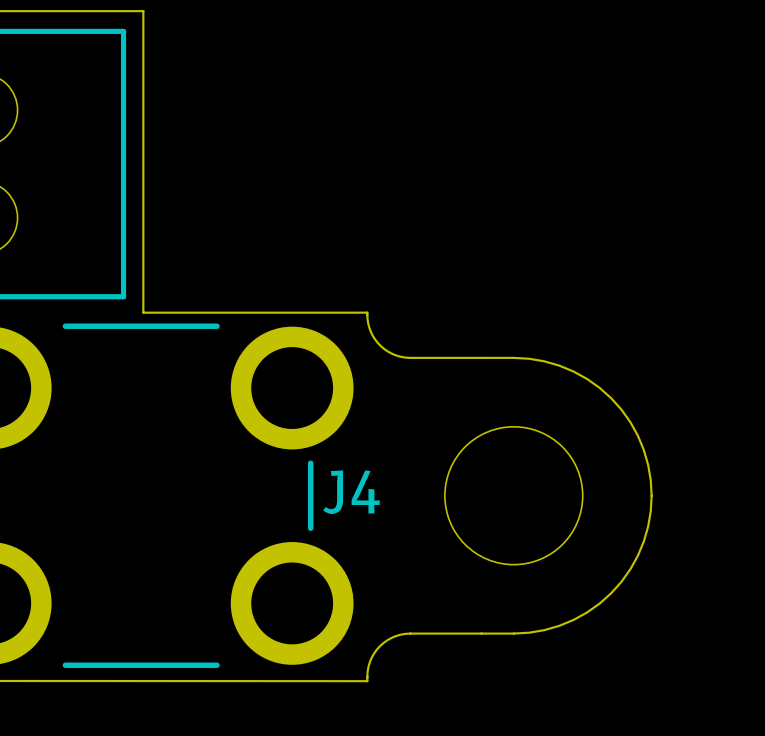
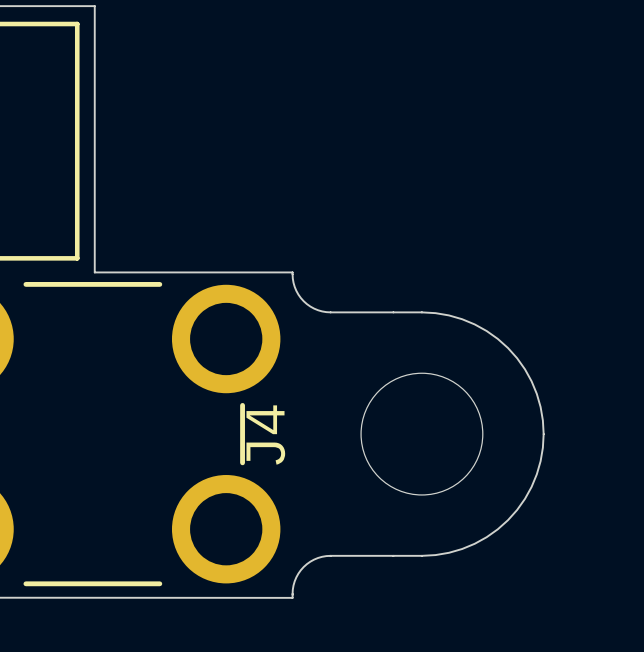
J4 name rotation: 0° (351, 492) -> 90° counterclockwise (265, 435)

